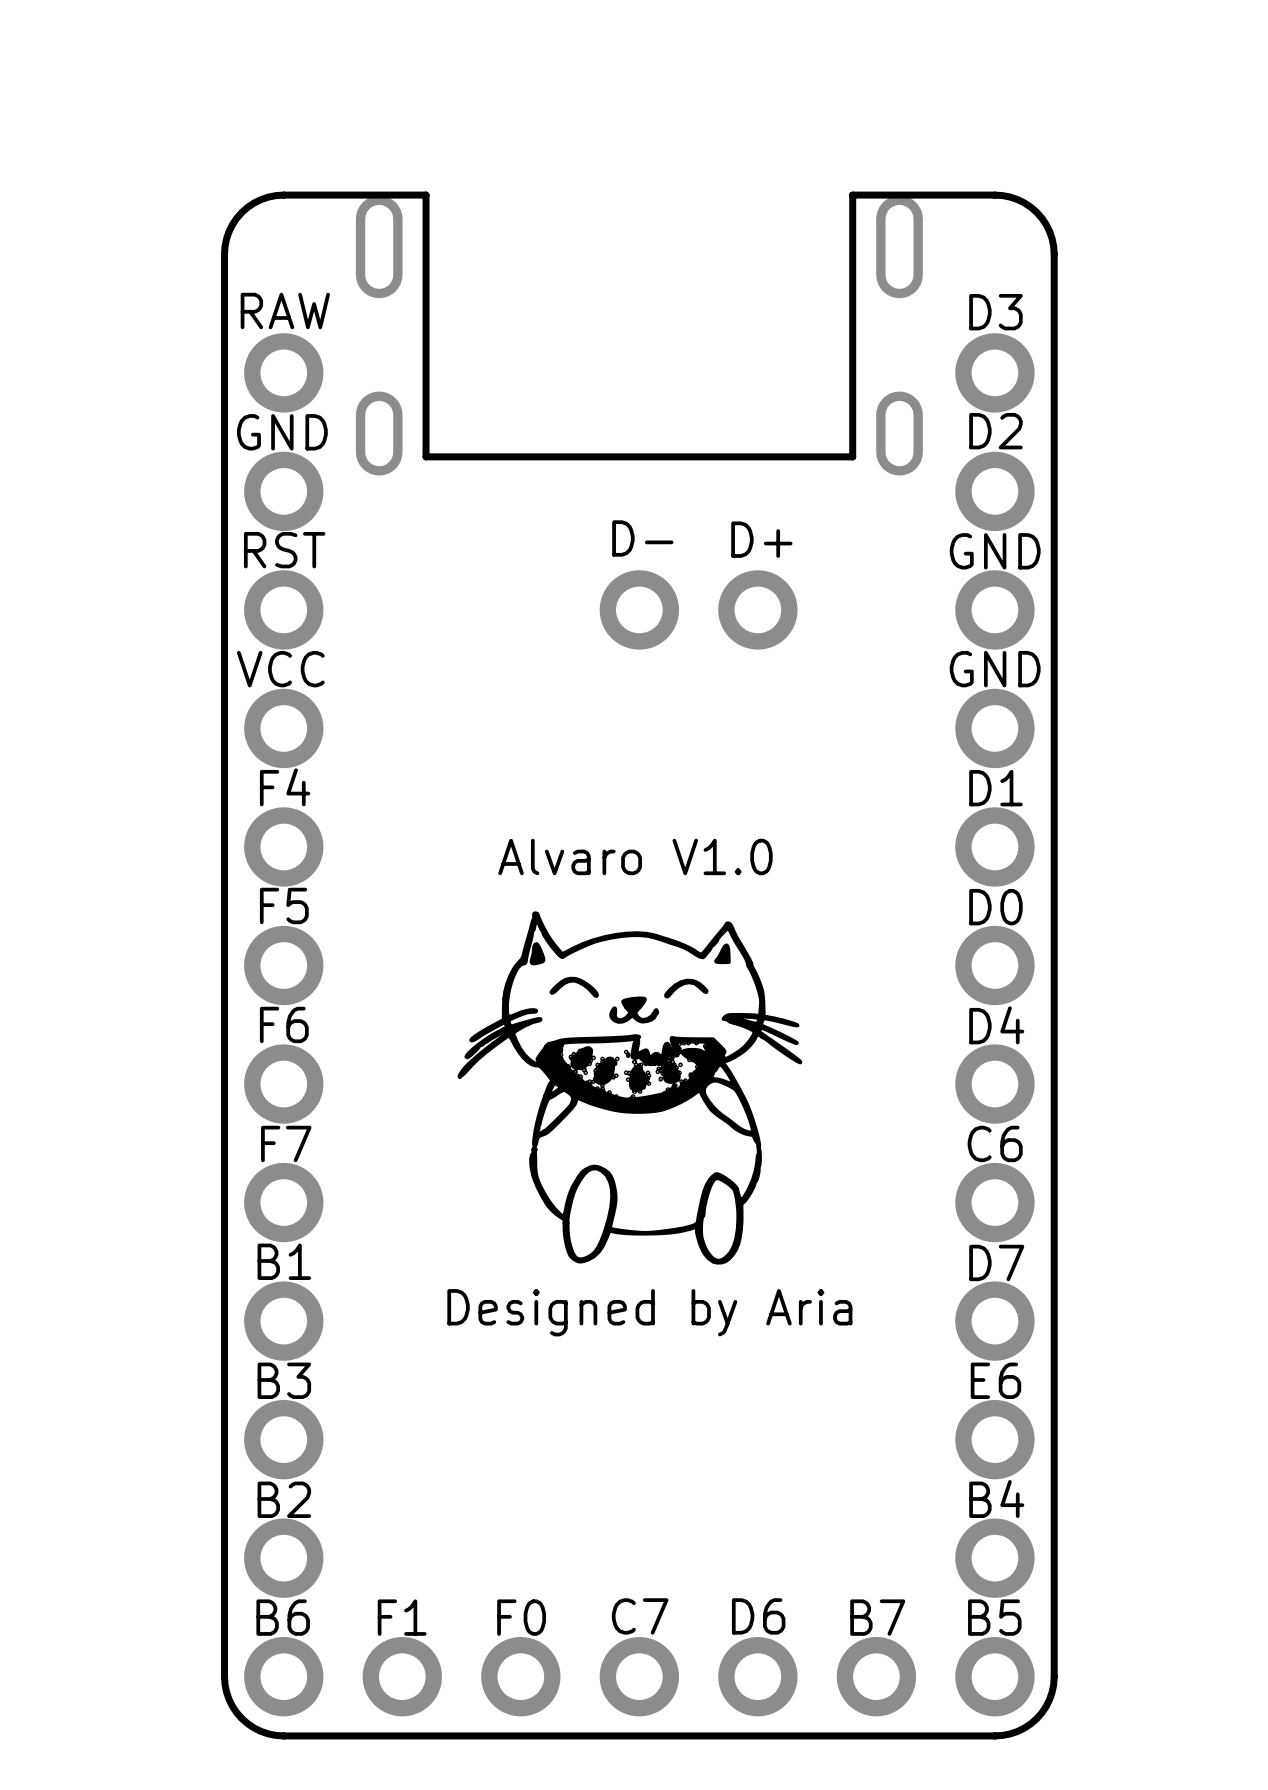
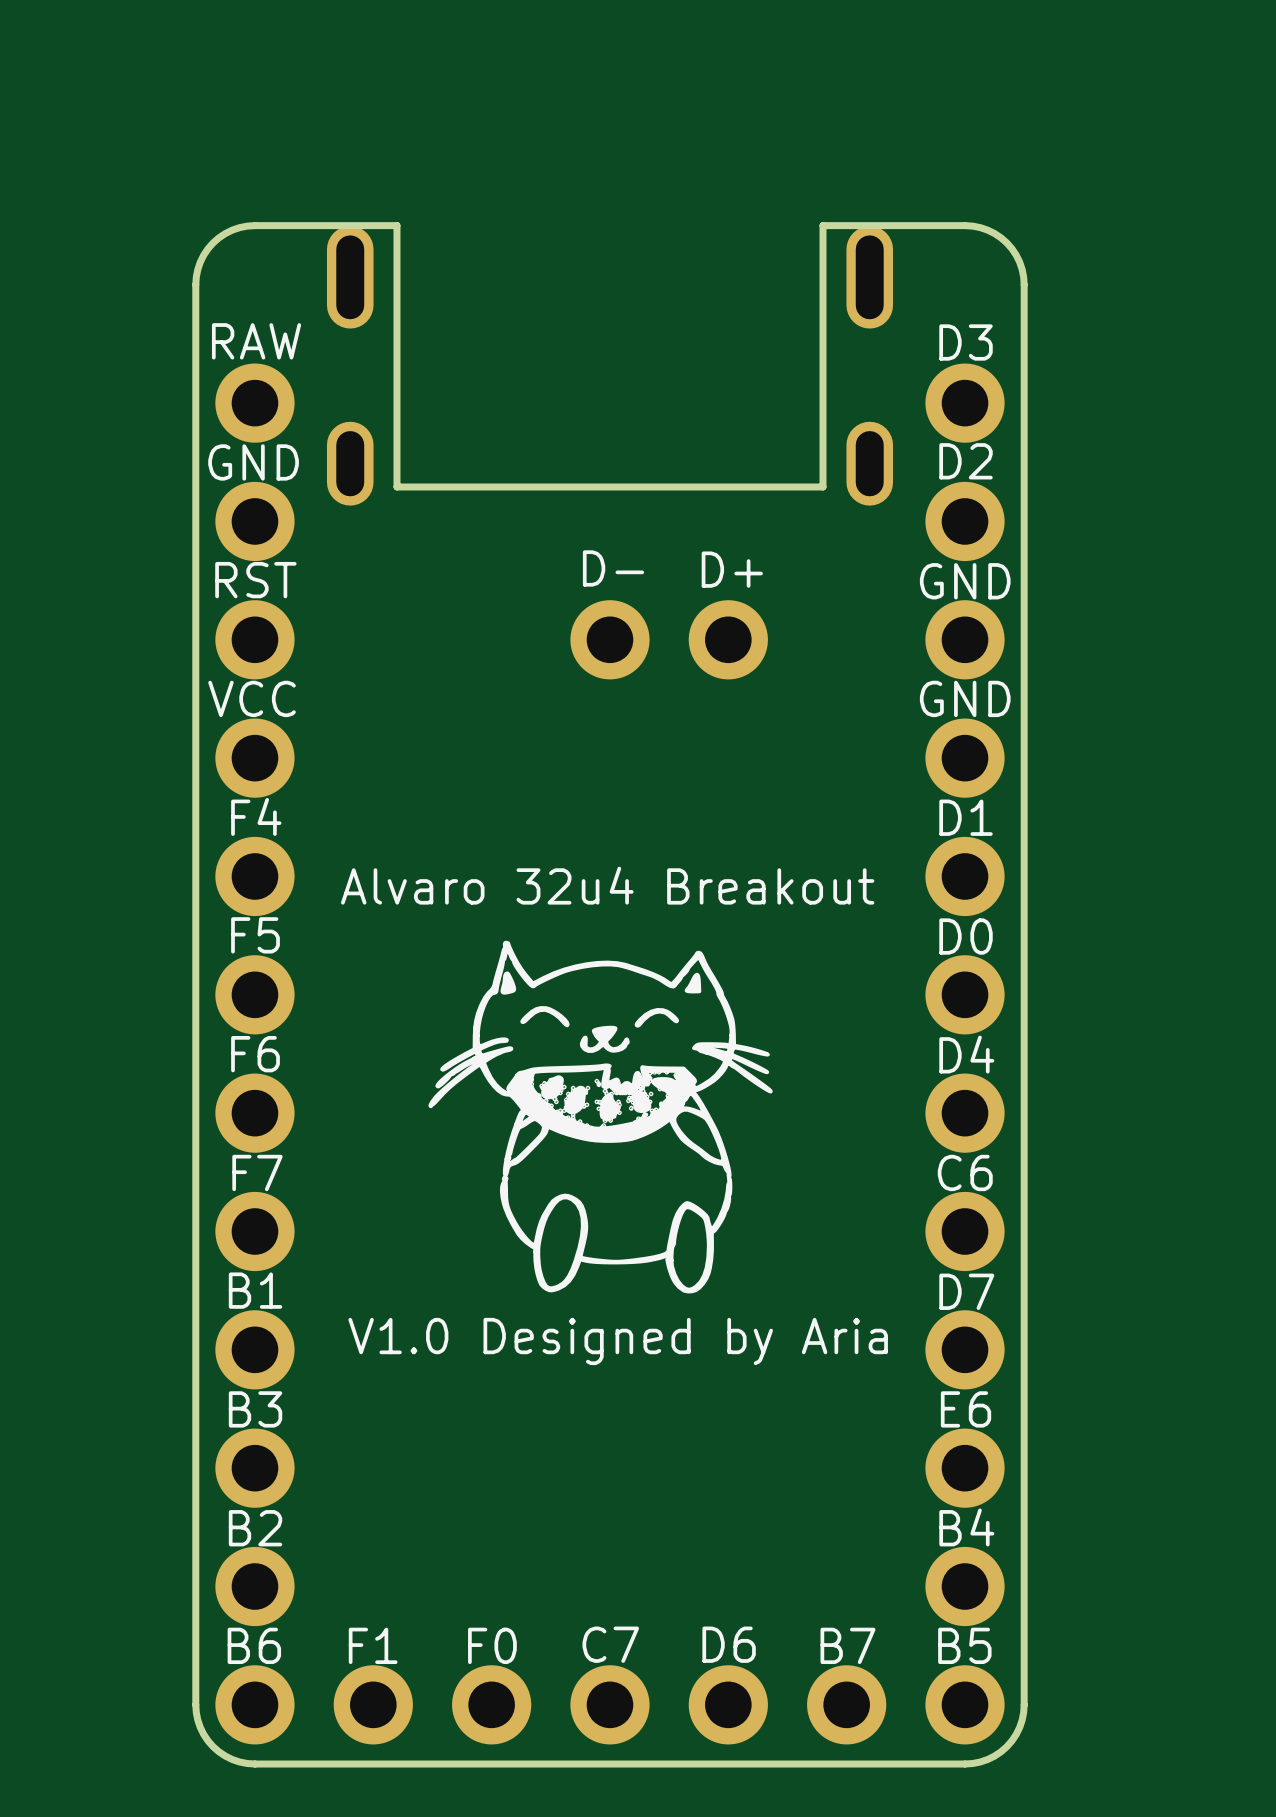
text: Alvaro V1.0 (635, 856) -> Alvaro 32u4 Breakout (607, 885)
text: Designed by Aria (649, 1312) -> V1.0 Designed by Aria (618, 1341)

